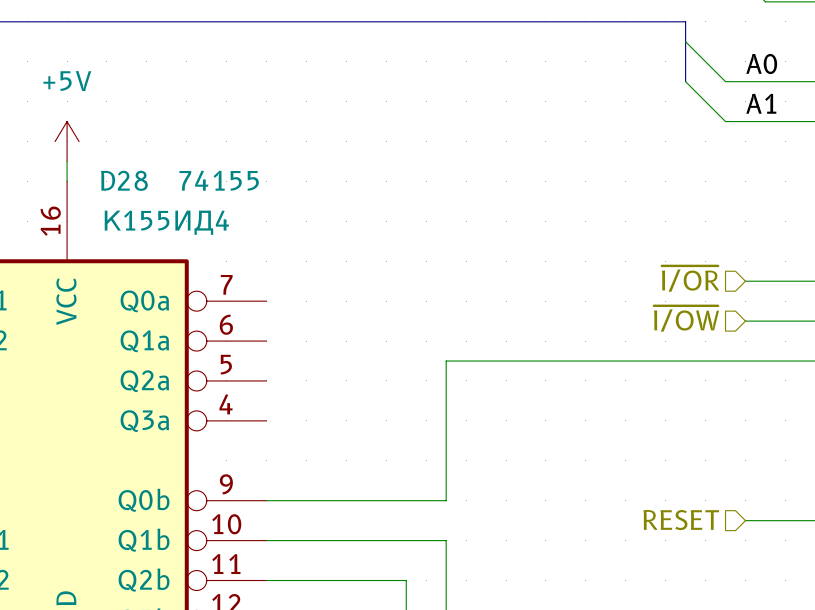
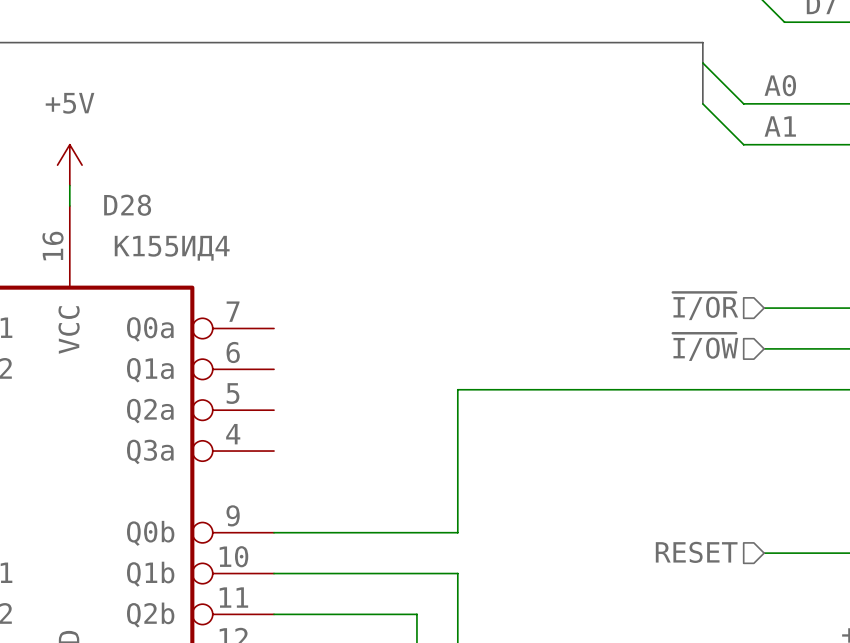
D28 value: 74155 (219, 180) -> none

